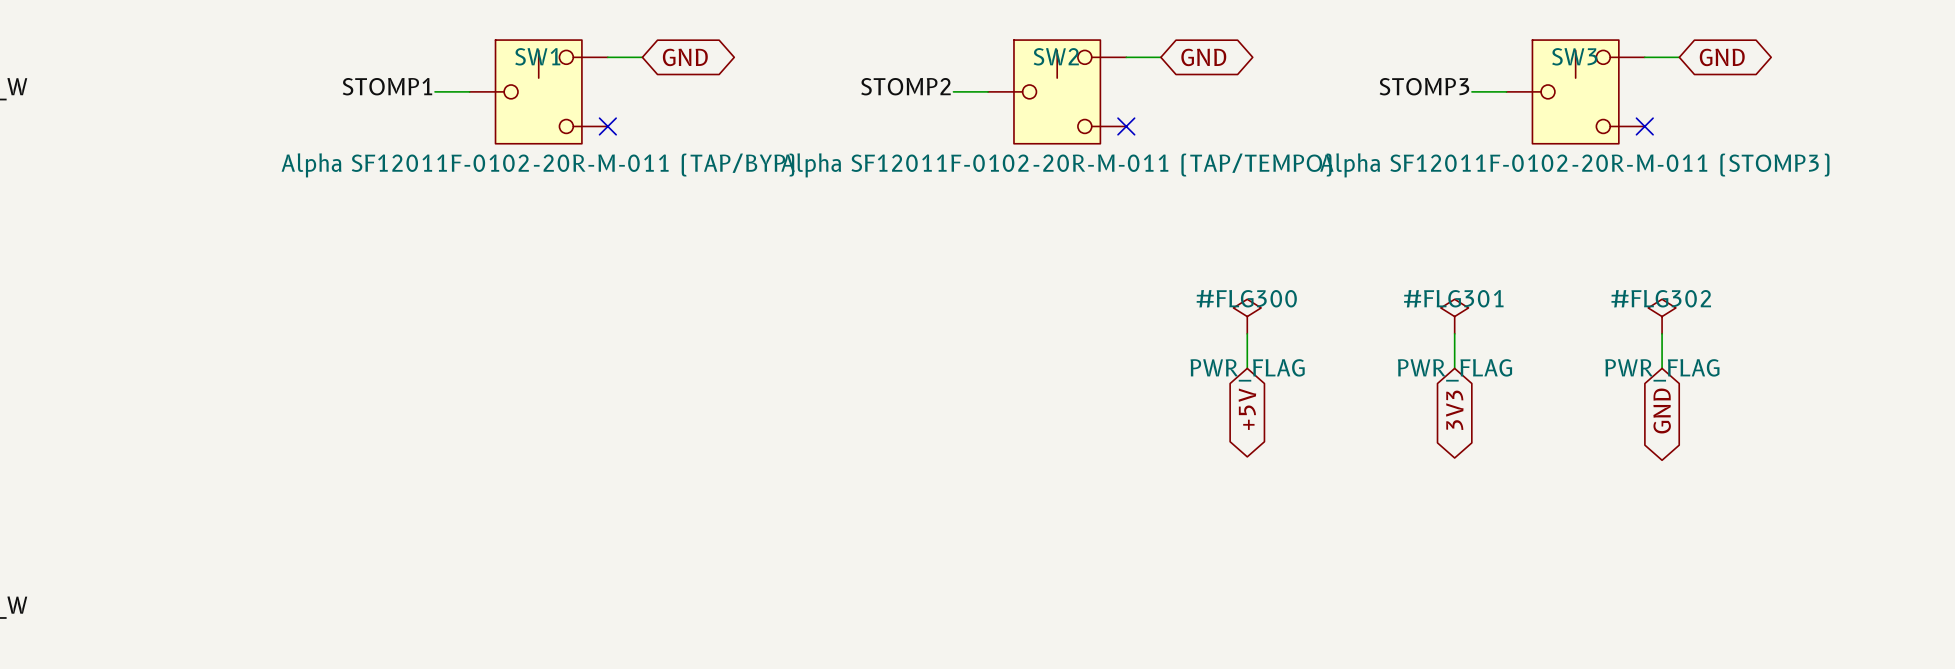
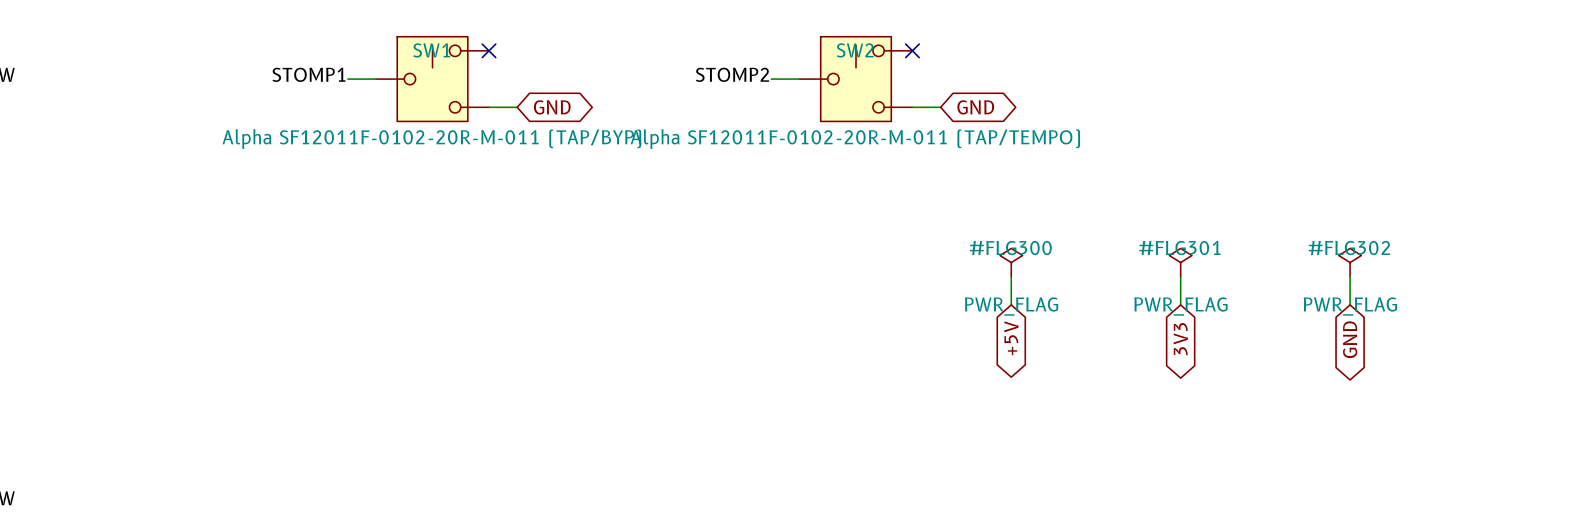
wire: (607, 57) (642, 57) -> (488, 107) (517, 107)
global label position: GND (685, 57) -> GND (552, 107)
wire: (1126, 57) (1160, 57) -> (912, 107) (940, 107)
global label position: GND (1203, 57) -> GND (975, 107)
wire: (1644, 57) (1679, 57) -> none
global label: GND (1722, 57) -> none
label: STOMP3 (1424, 86) -> none
wire: (1471, 91) (1506, 91) -> none
SW3: Alpha SF12011F-0102-20R-M-011 (STOMP3) (1575, 91) -> none
no-connect mark position: (607, 126) -> (488, 50)
no-connect mark position: (1126, 126) -> (912, 50)
no-connect mark: (1644, 126) -> none

